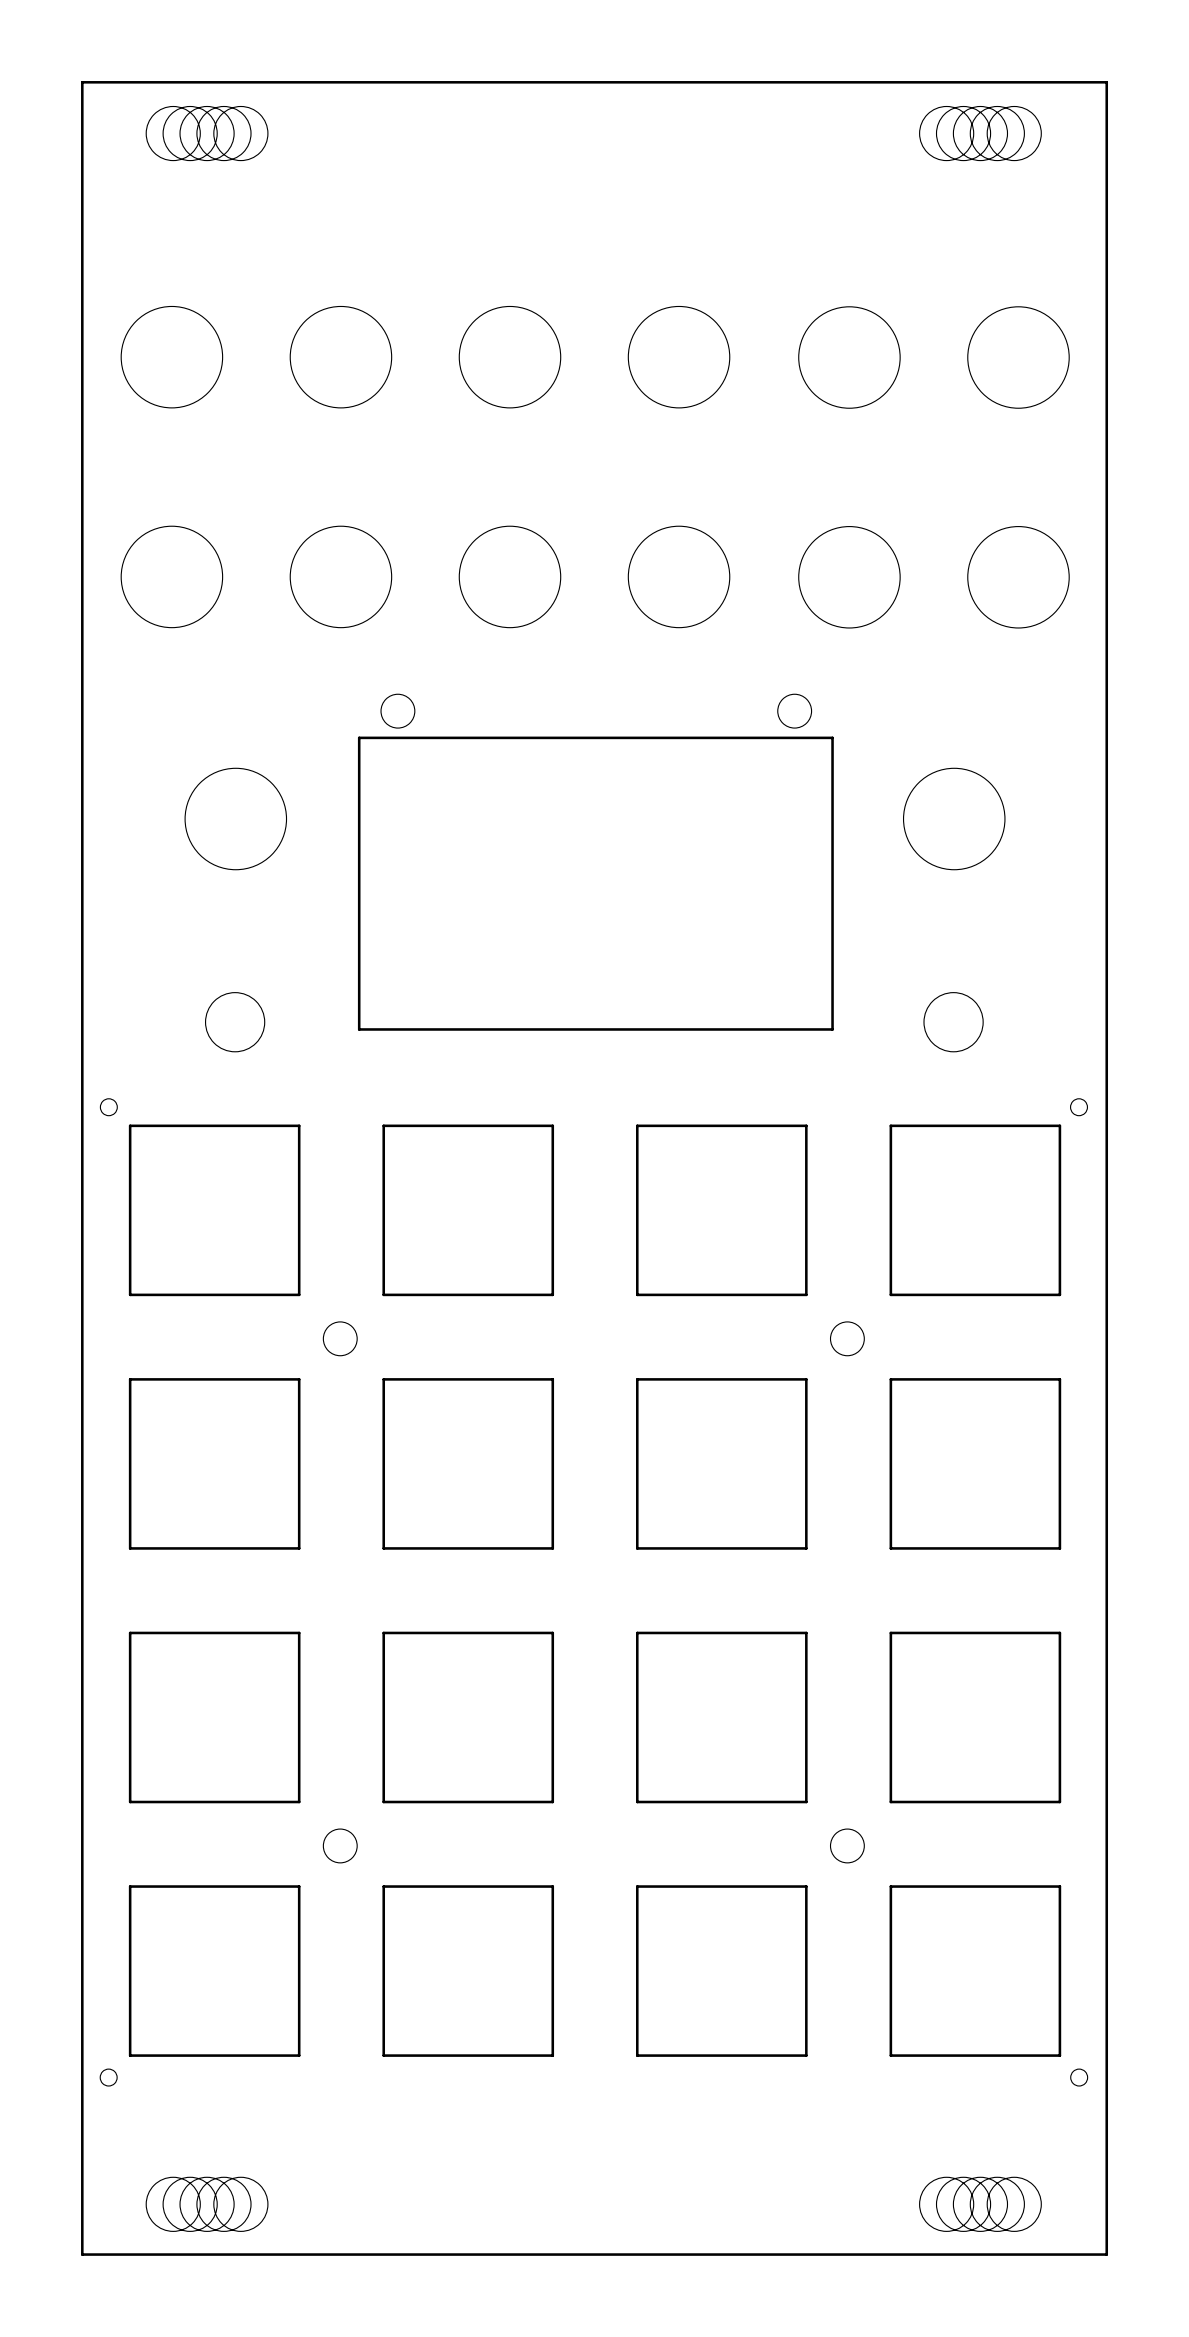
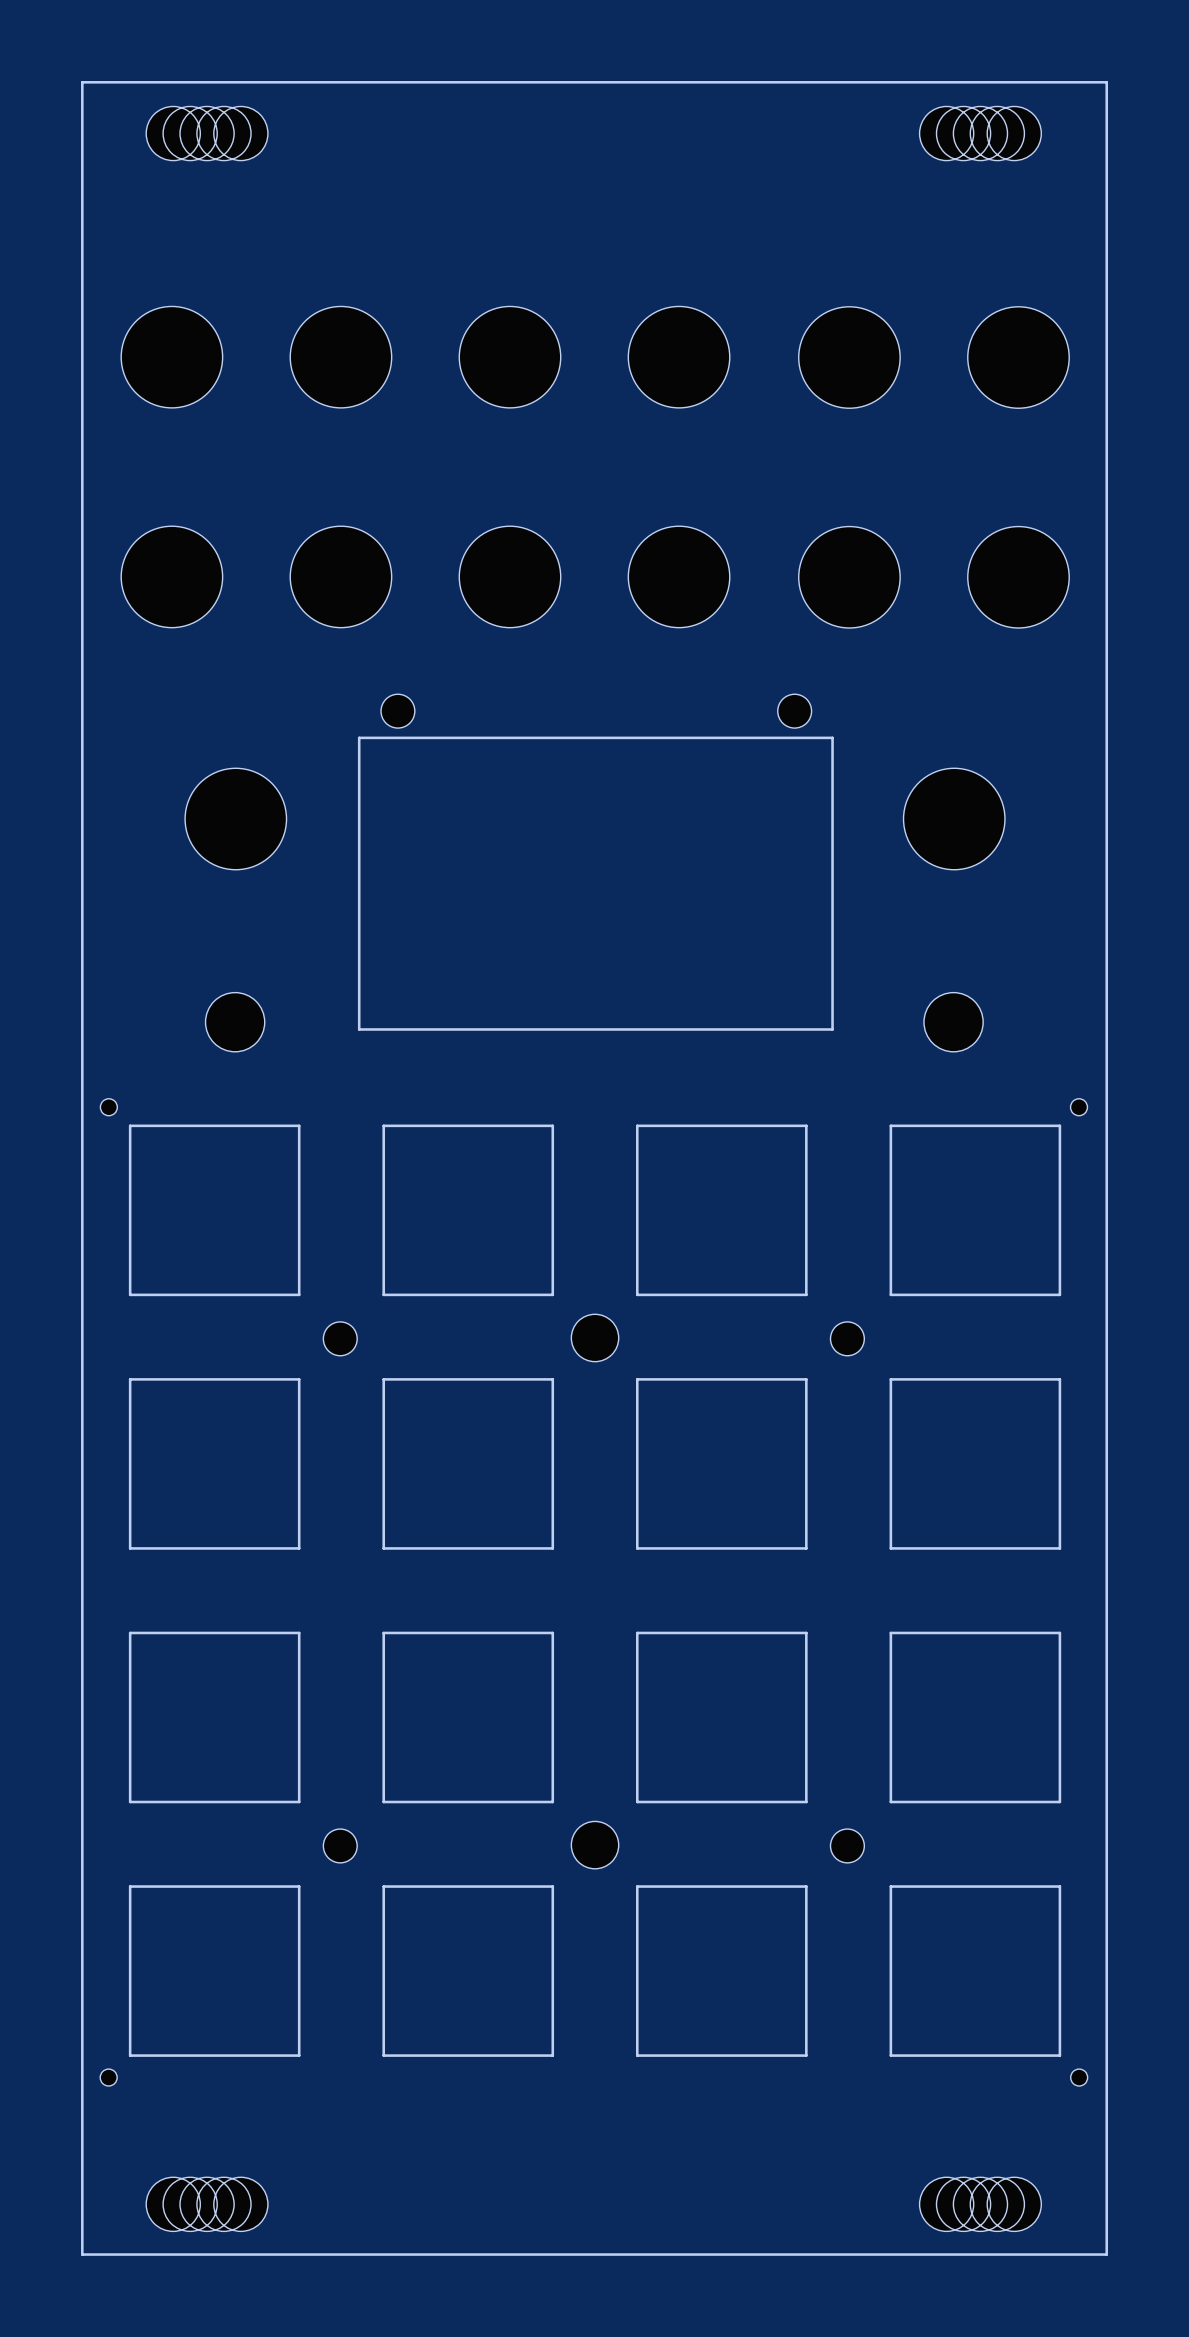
hole: none -> (595, 1337)
hole: none -> (595, 1845)

